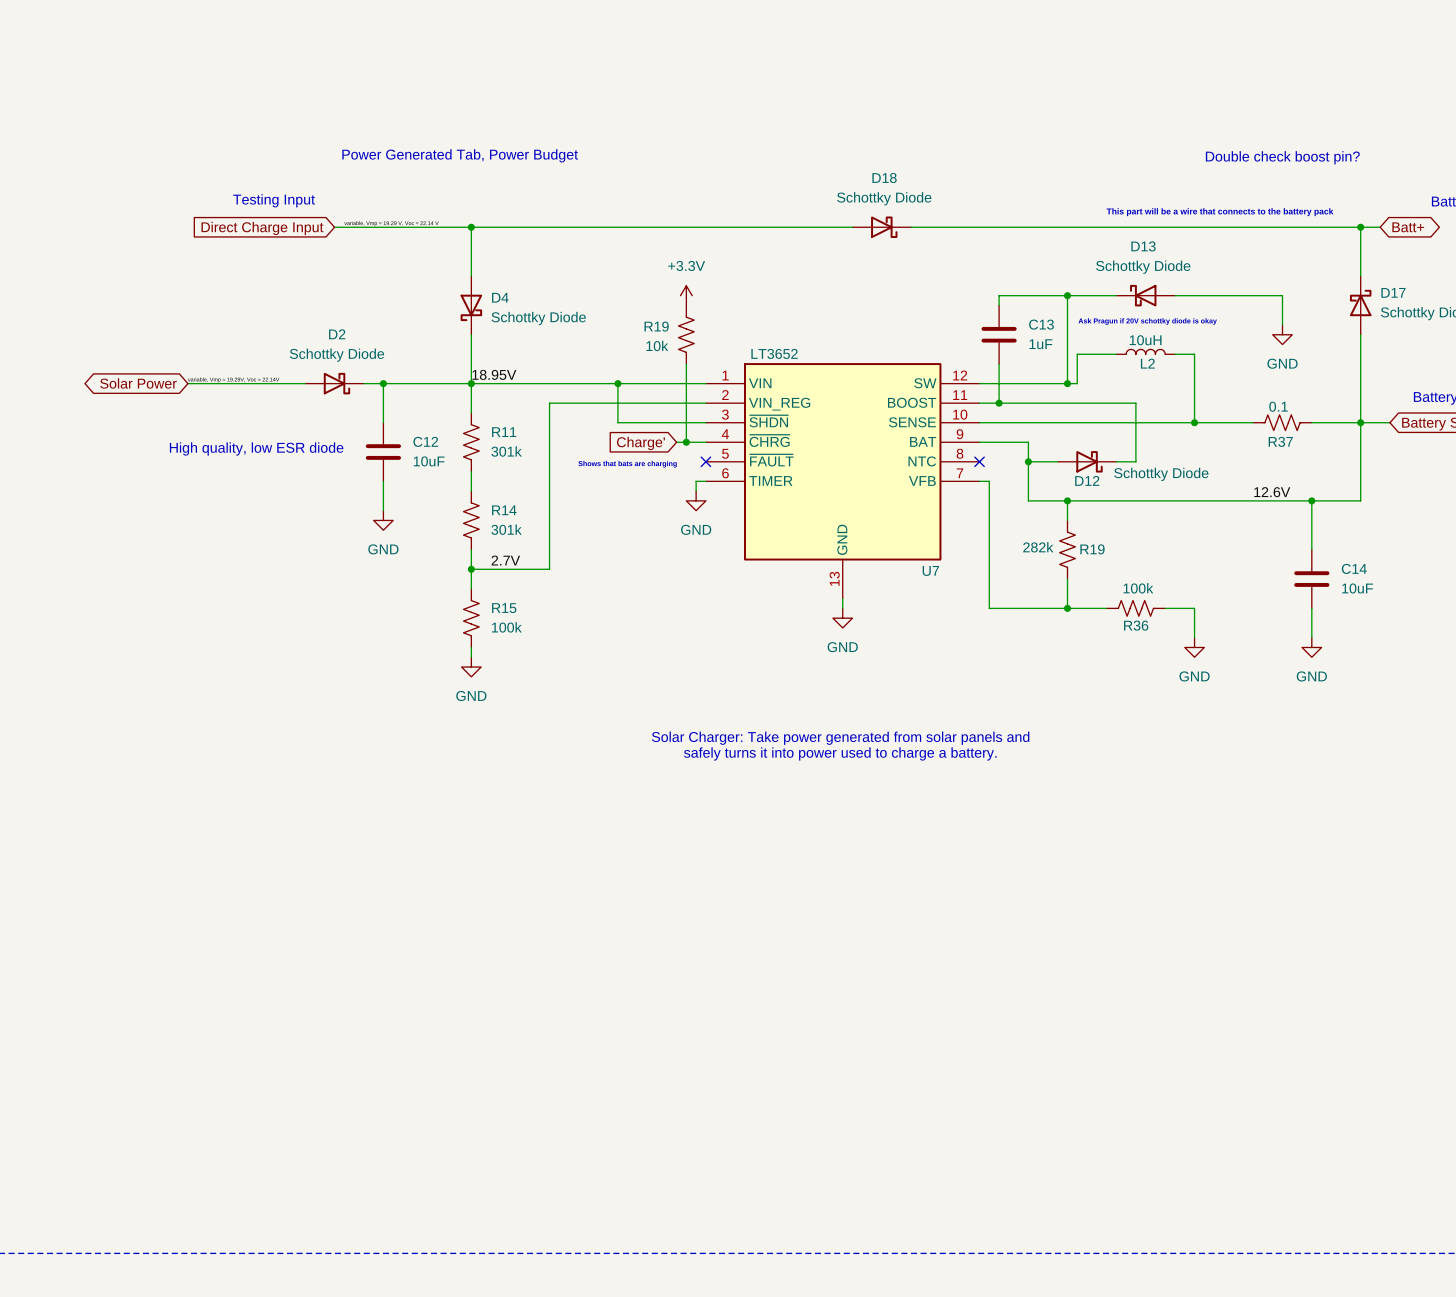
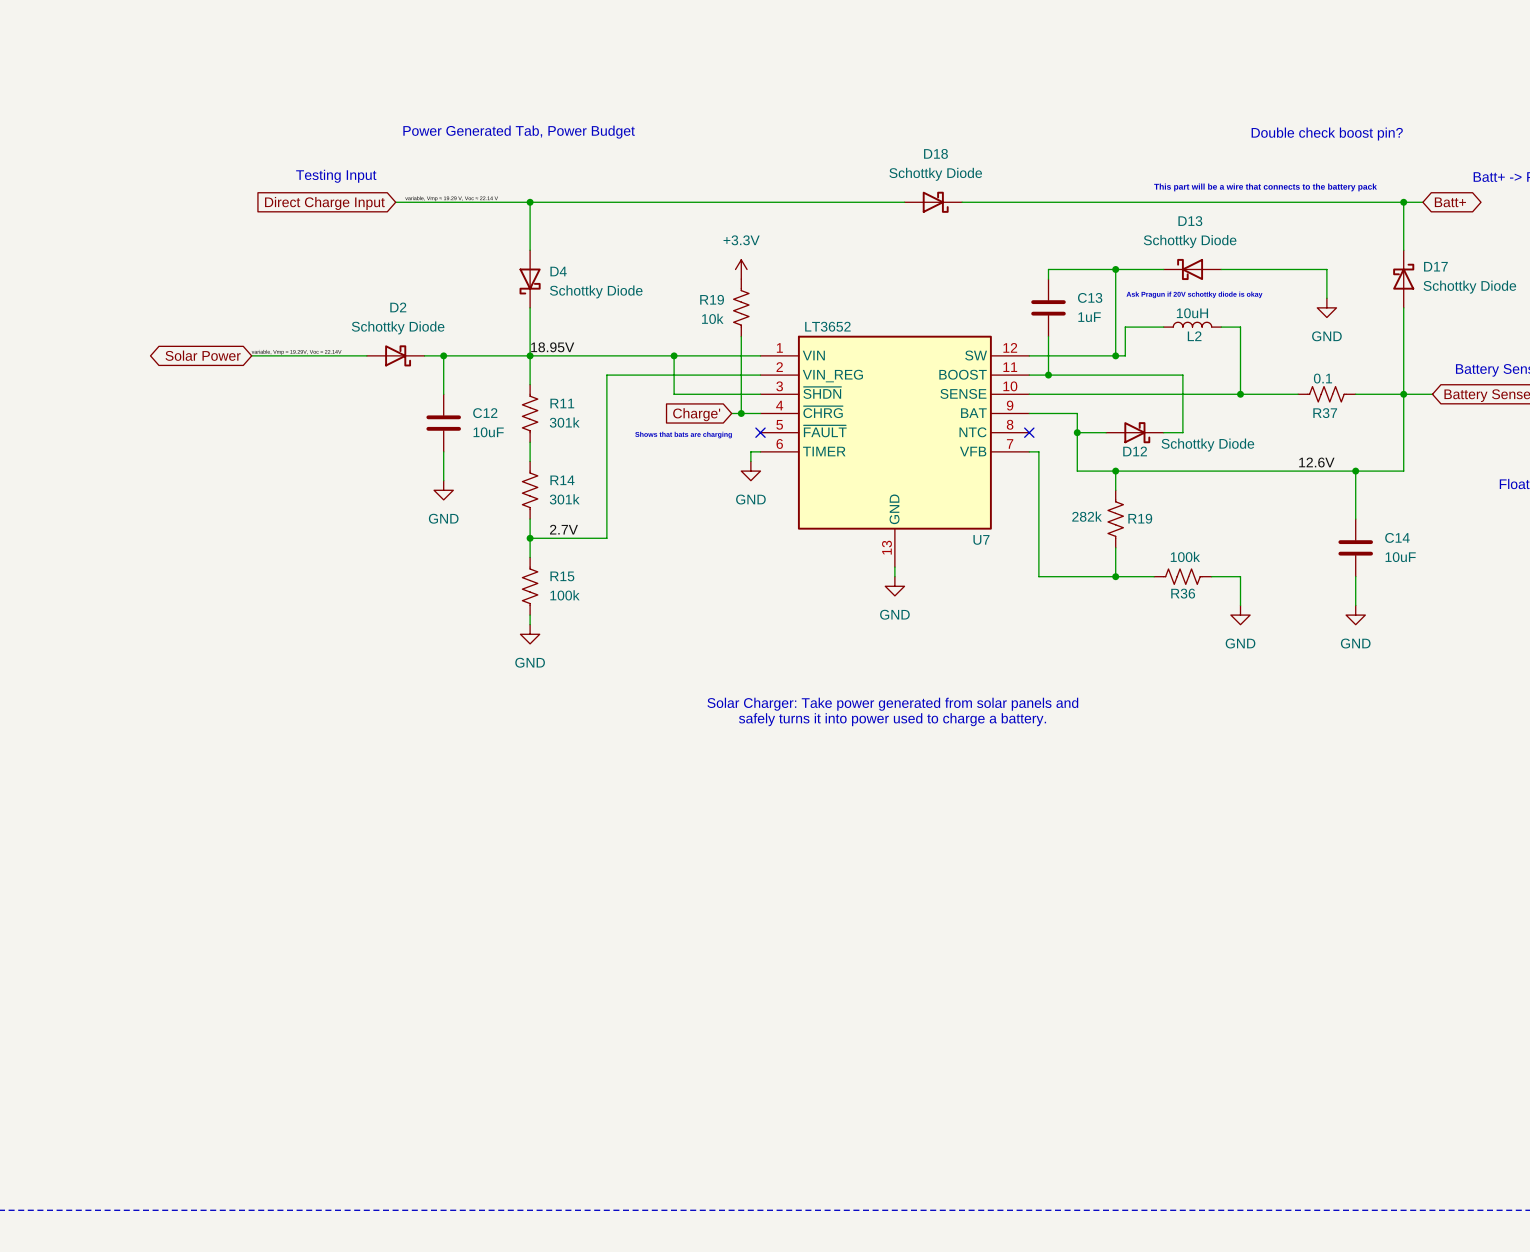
text: High quality, low ESR diode (256, 449) -> none

